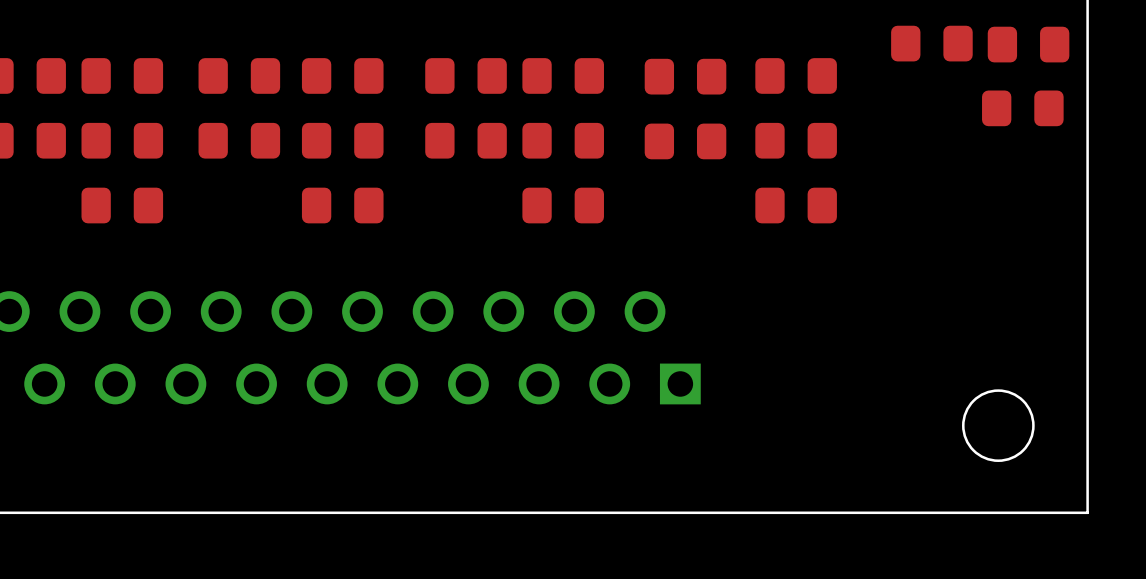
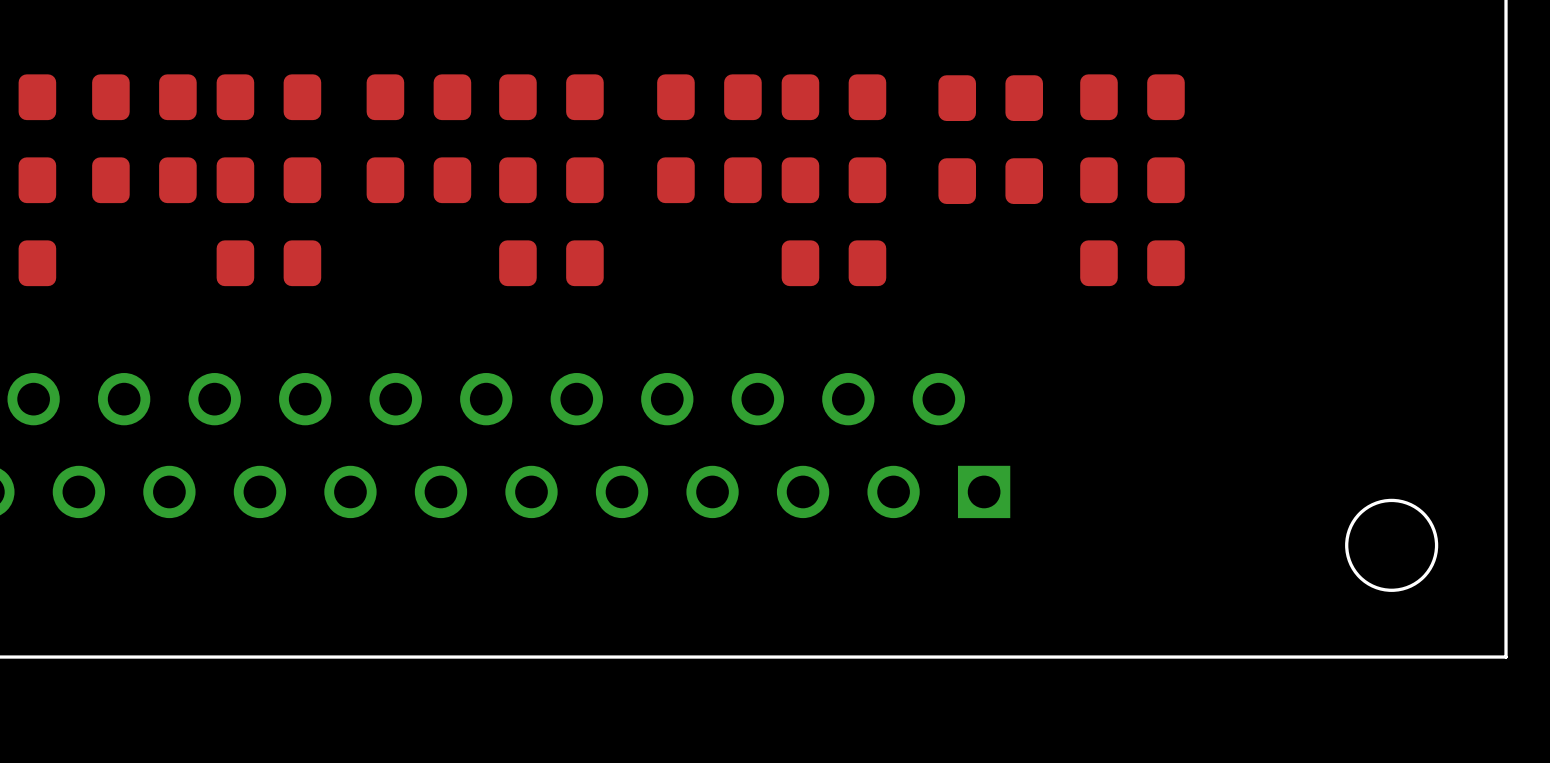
part: (931, 43) -> none
part: (1028, 44) -> none
part: (1022, 108) -> none

